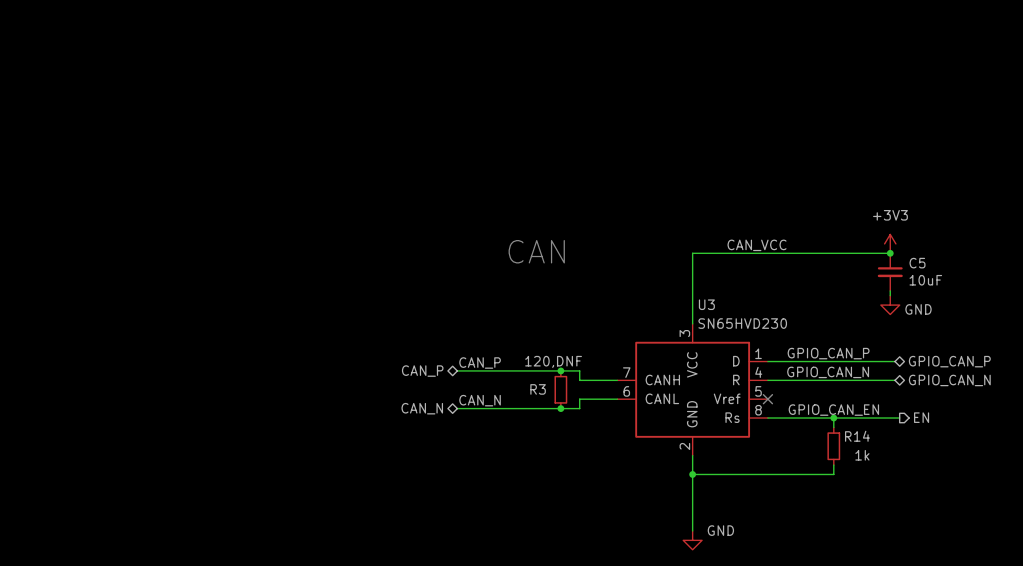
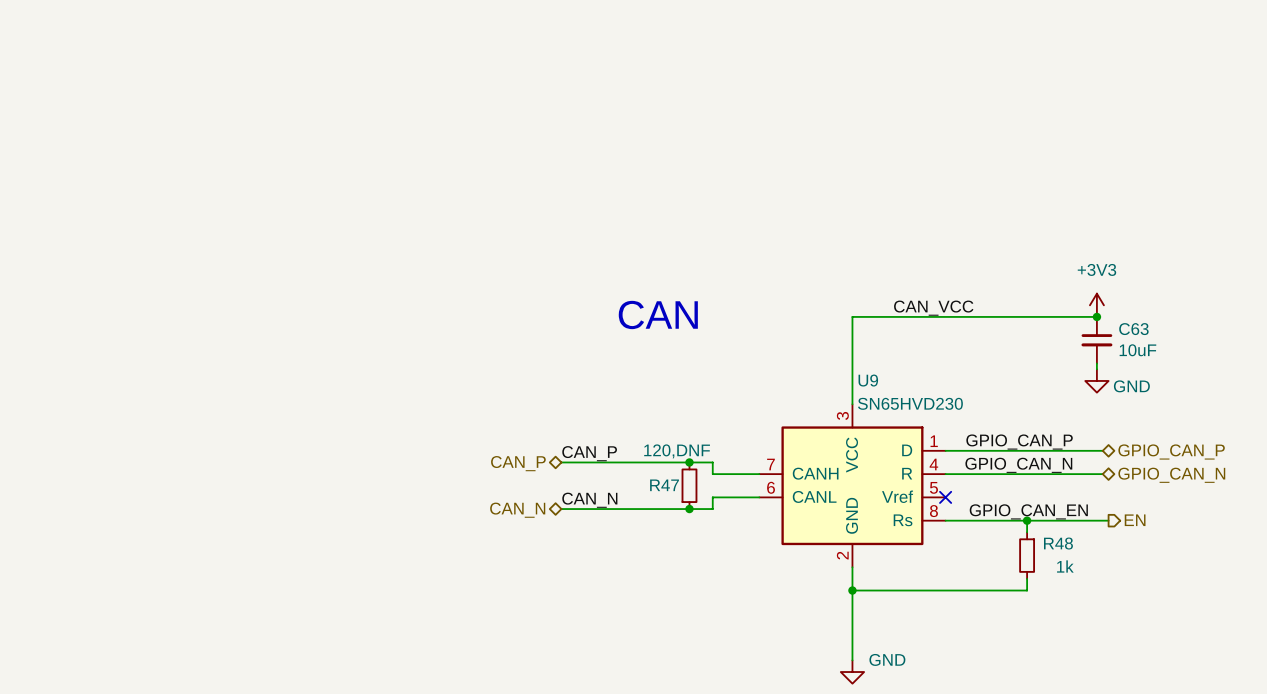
C5 name: C5 (917, 263) -> C63 (1133, 329)
U3 name: U3 (706, 304) -> U9 (868, 380)
R3 name: R3 (538, 389) -> R47 (664, 485)
R14 name: R14 (857, 436) -> R48 (1058, 543)

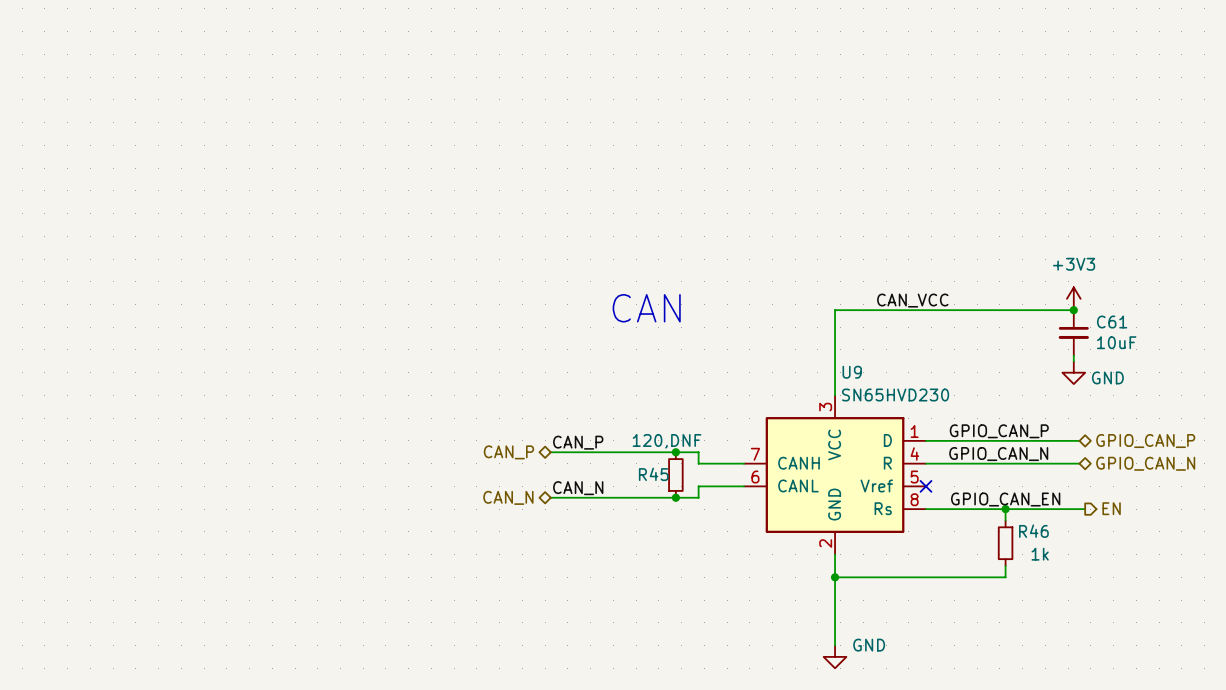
C63 name: C63 (1133, 329) -> C61 (1112, 322)
R47 name: R47 (664, 485) -> R45 (653, 474)
R48 name: R48 (1058, 543) -> R46 (1033, 531)

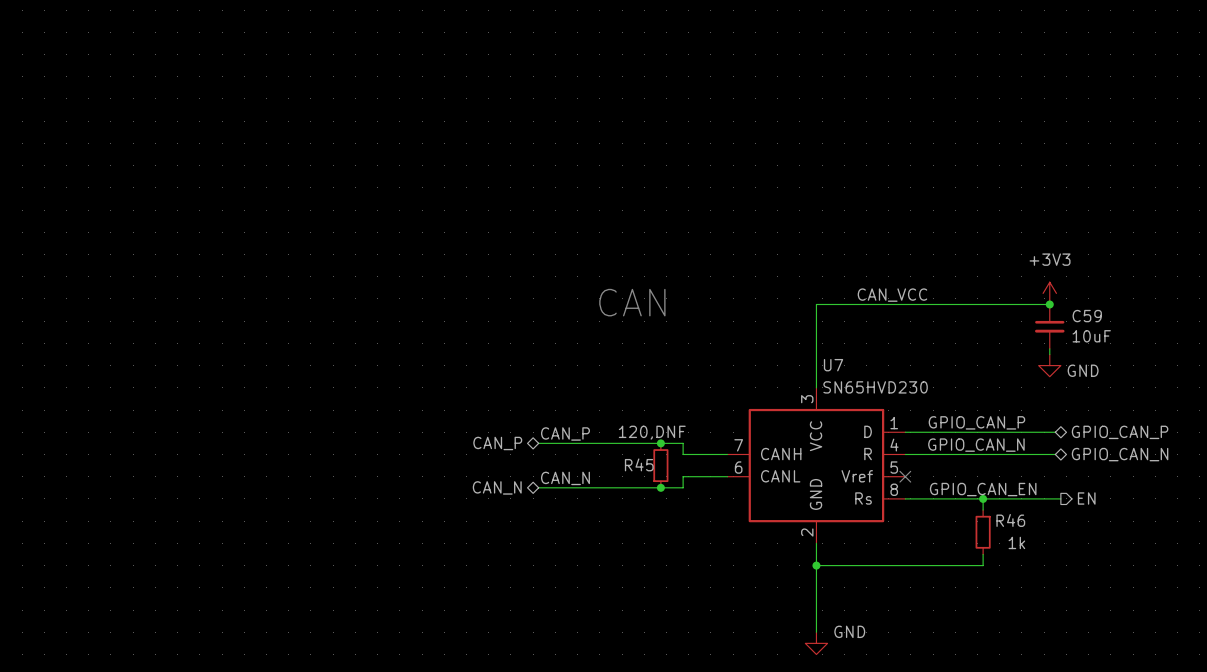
C61 name: C61 (1112, 322) -> C59 (1087, 316)
U9 name: U9 (852, 372) -> U7 (833, 365)

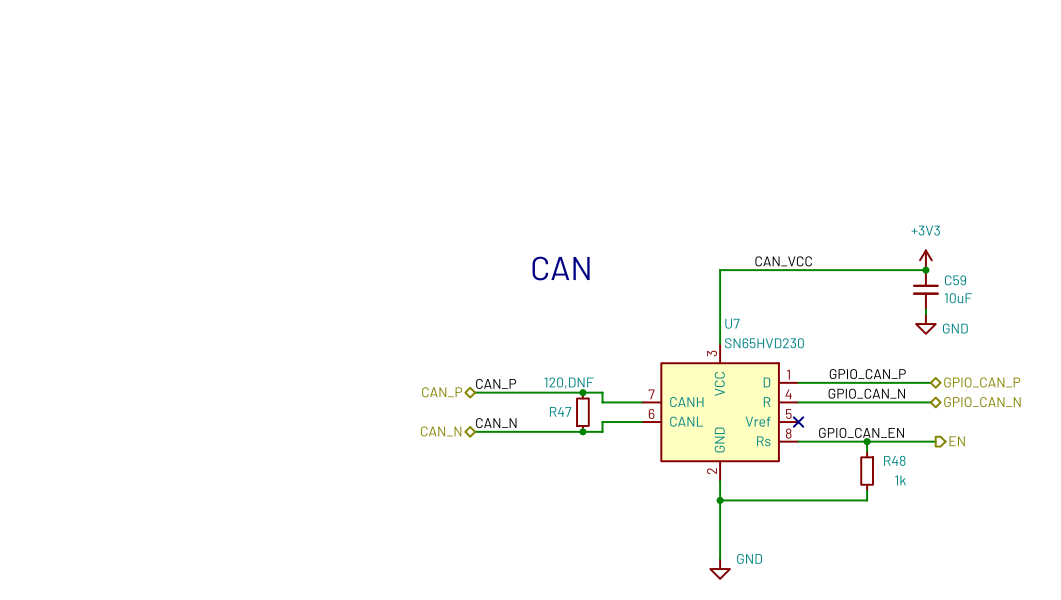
R45 name: R45 (639, 464) -> R47 (560, 411)
R46 name: R46 (1010, 520) -> R48 (894, 460)

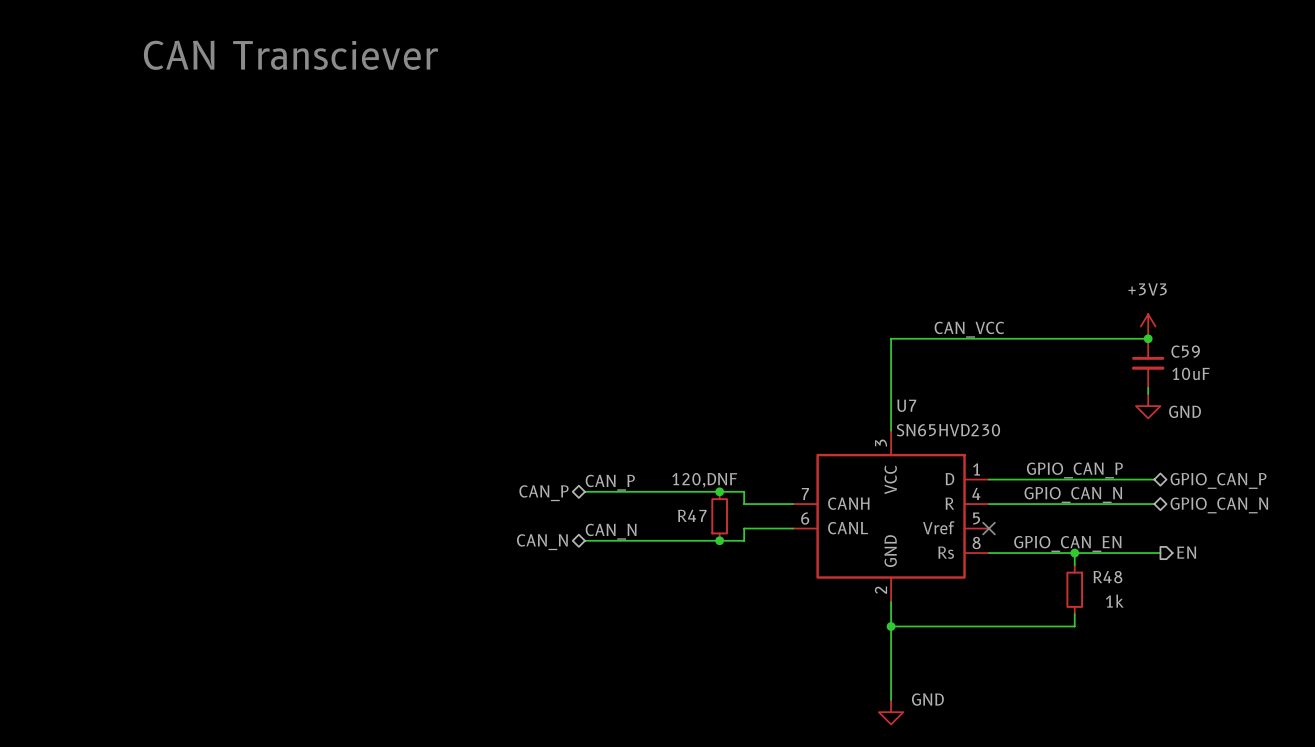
text: none -> CAN Transciever (290, 55)
text: CAN (561, 268) -> none

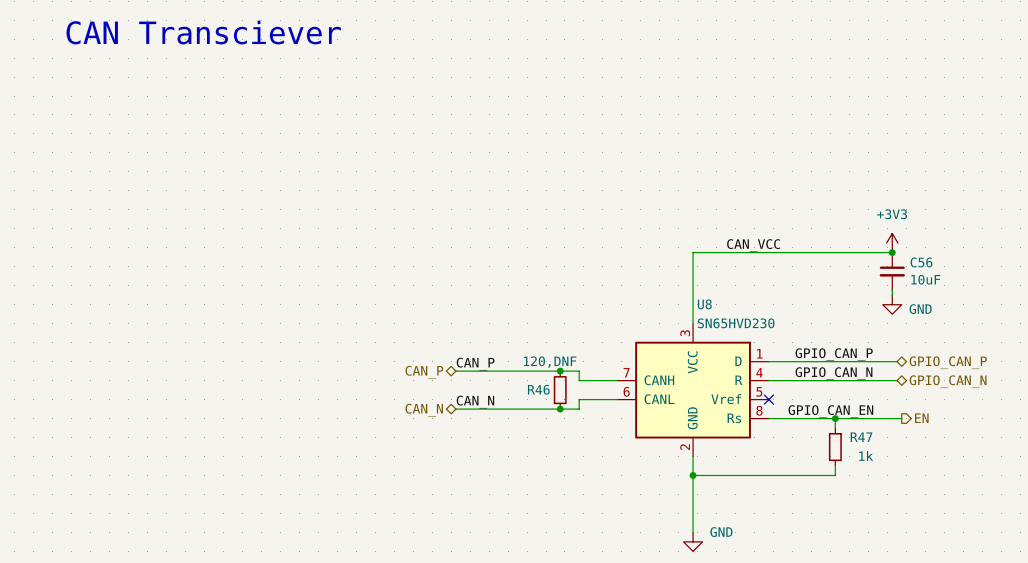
C59 name: C59 (1185, 351) -> C56 (921, 262)
U7 name: U7 (906, 405) -> U8 (704, 304)
R47 name: R47 (692, 515) -> R46 (538, 389)
R48 name: R48 (1107, 577) -> R47 (861, 437)

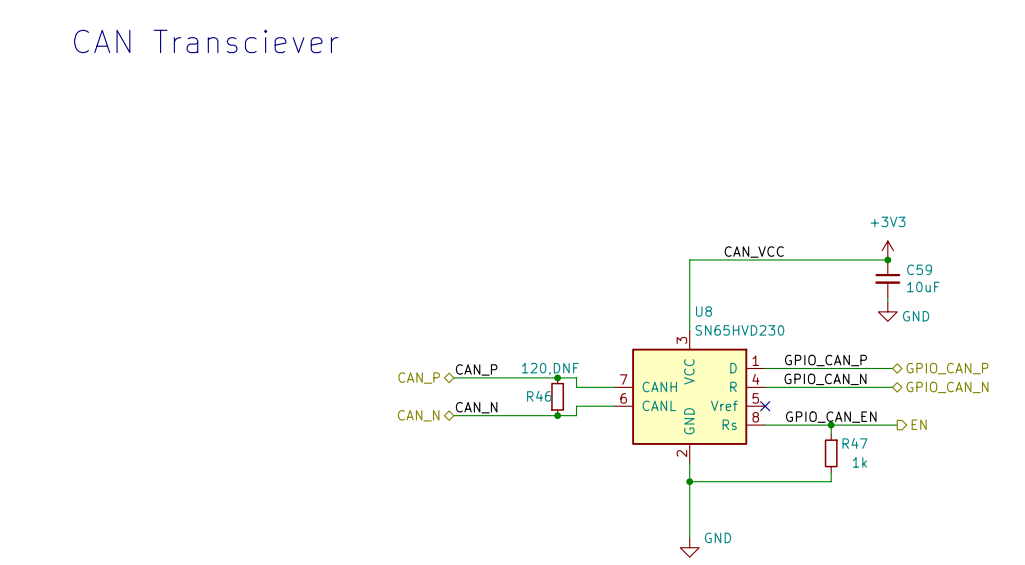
C56 name: C56 (921, 262) -> C59 (919, 269)

